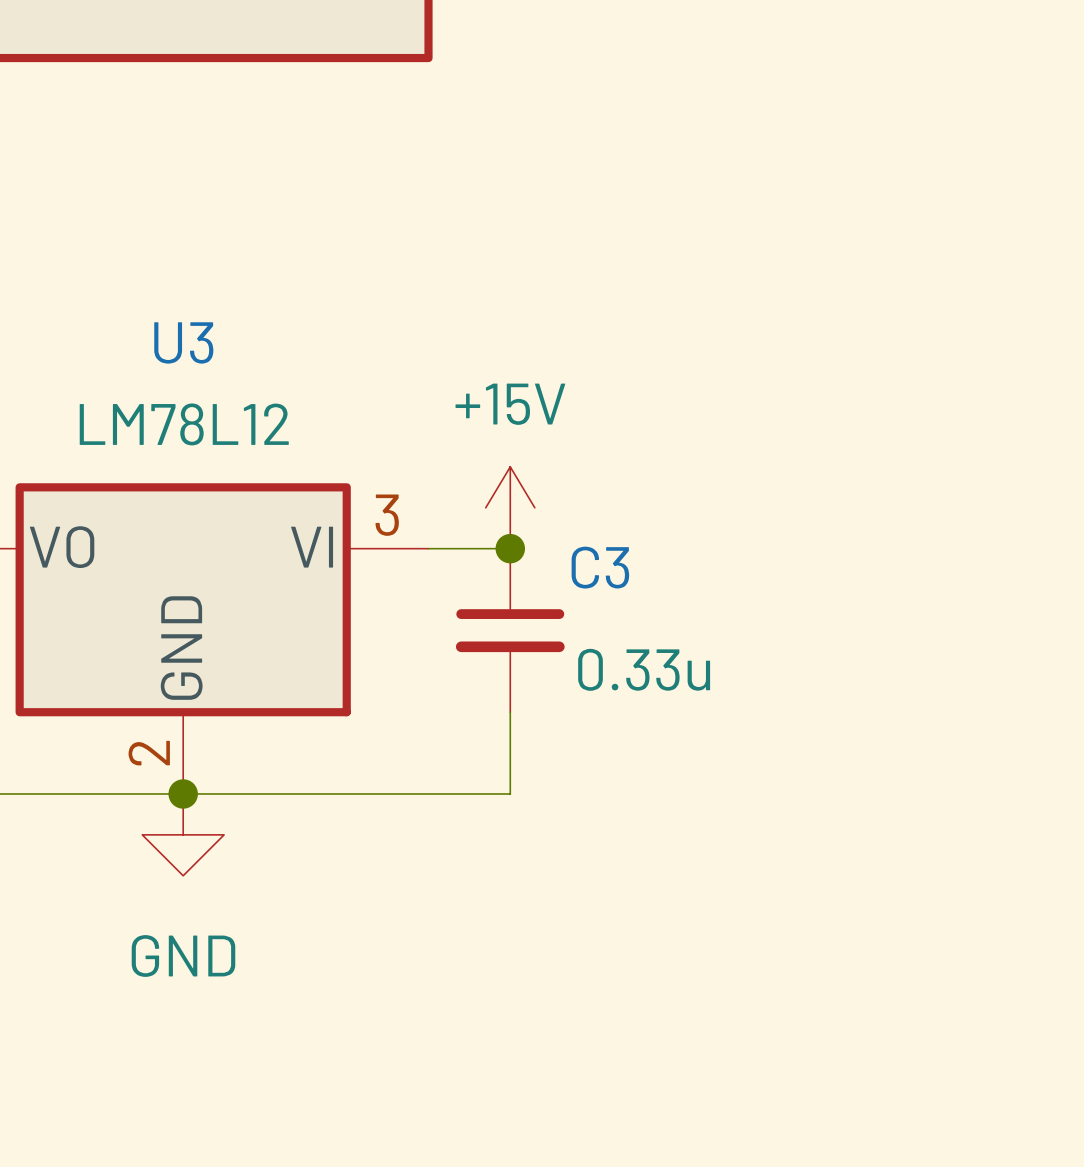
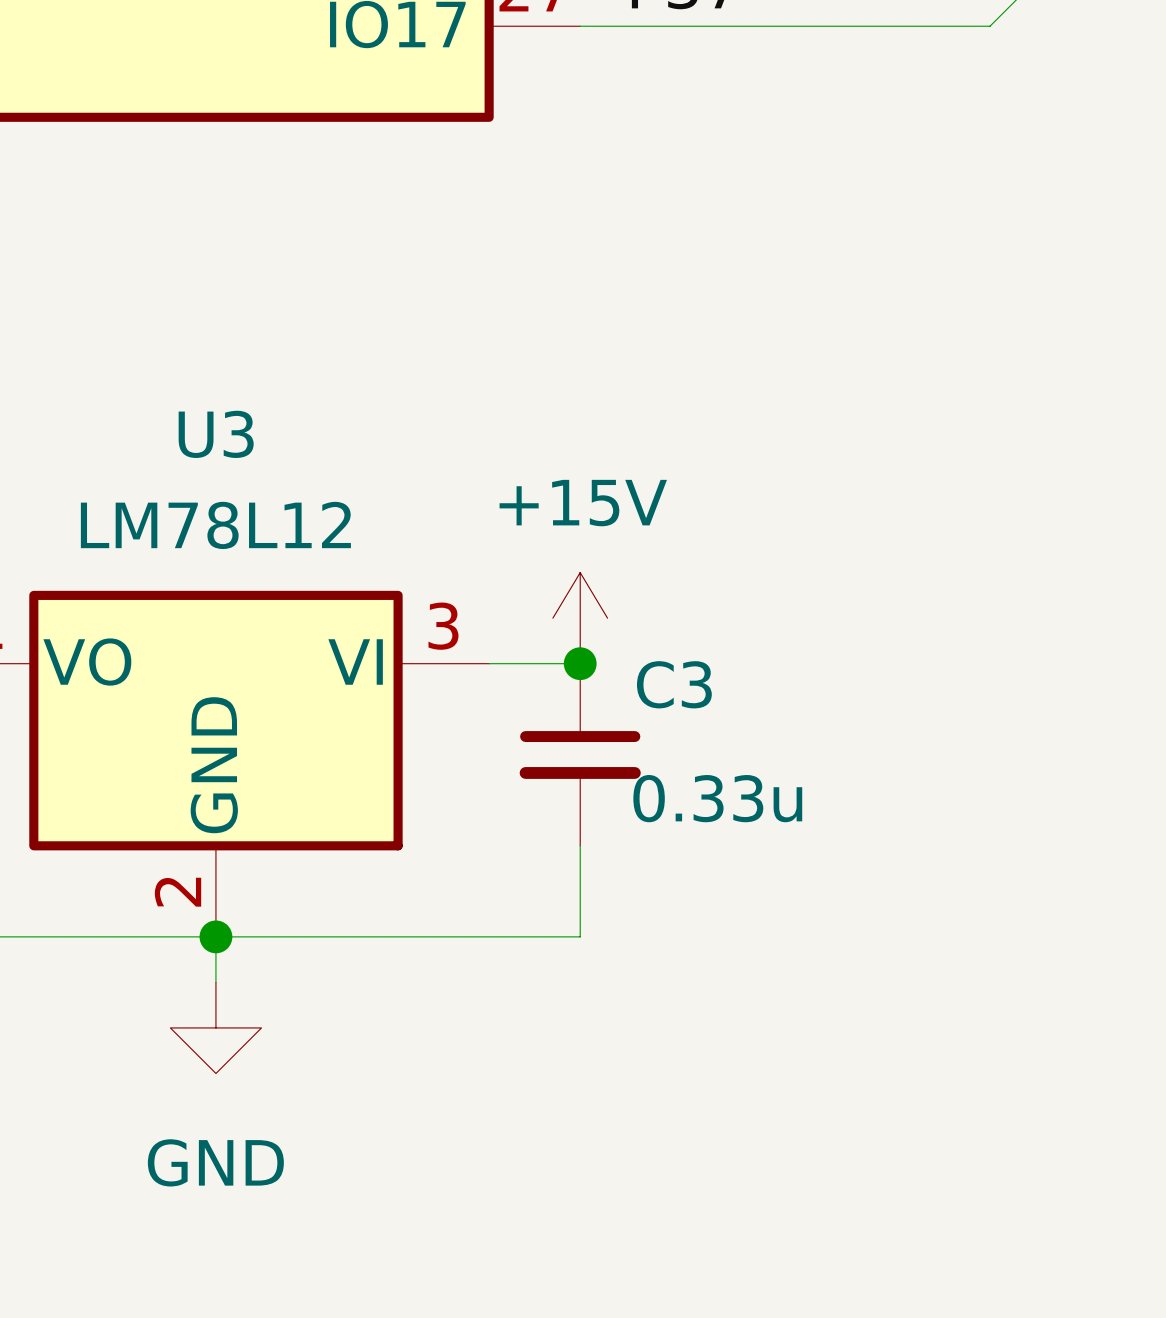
power symbol position: GND (183, 834) -> GND (215, 1027)

